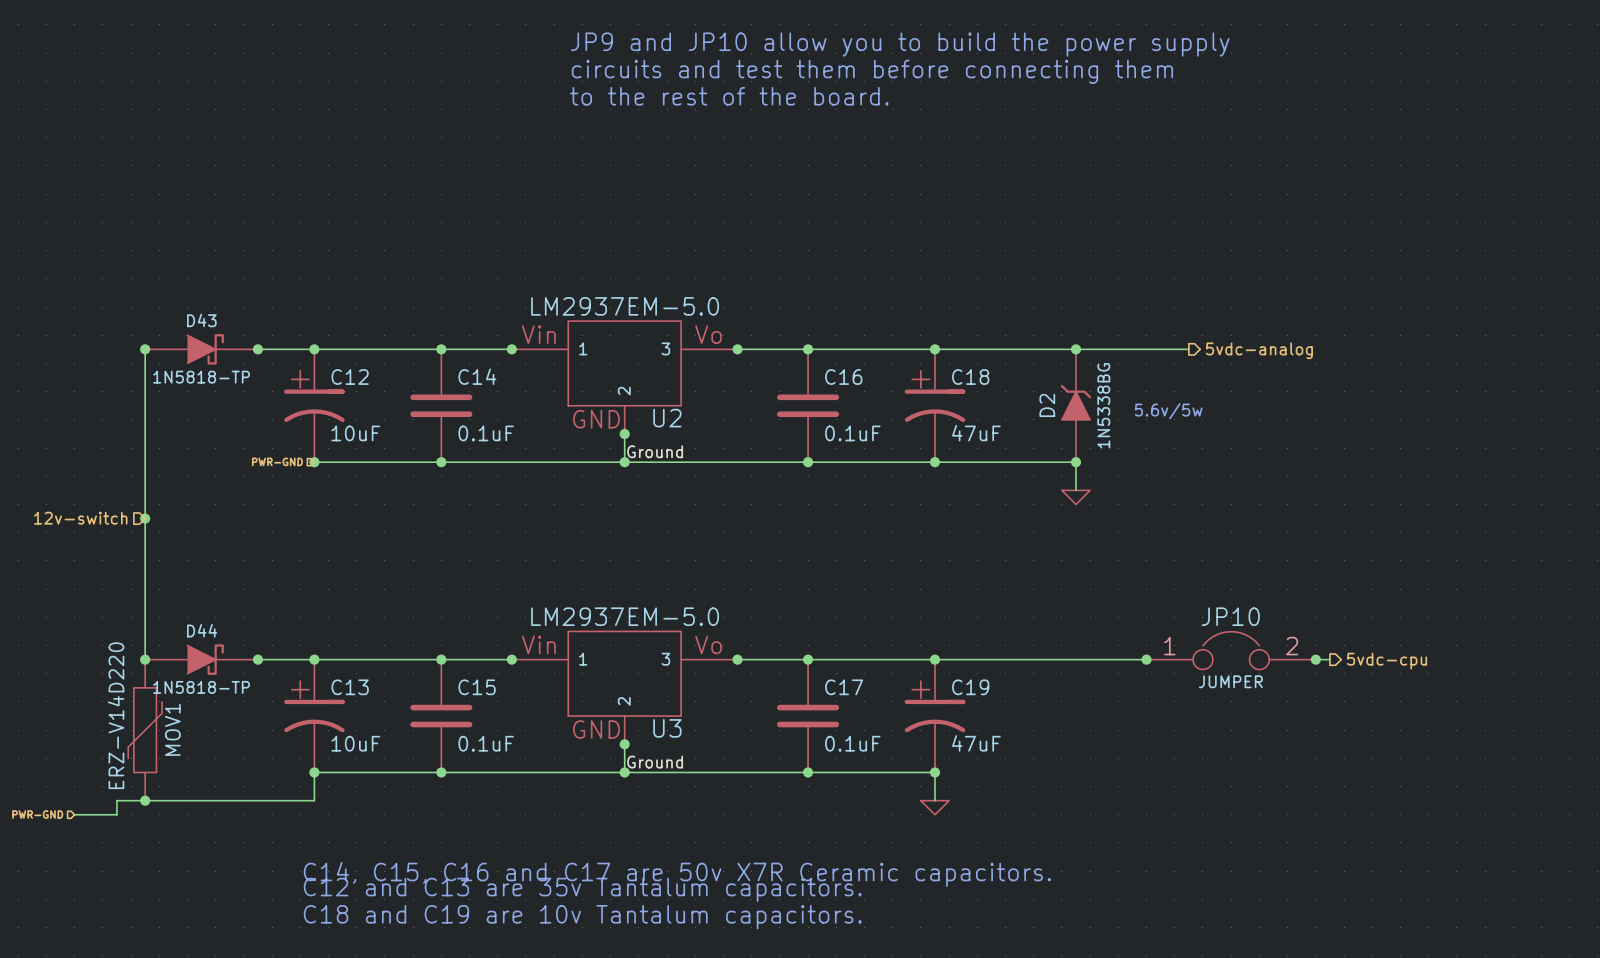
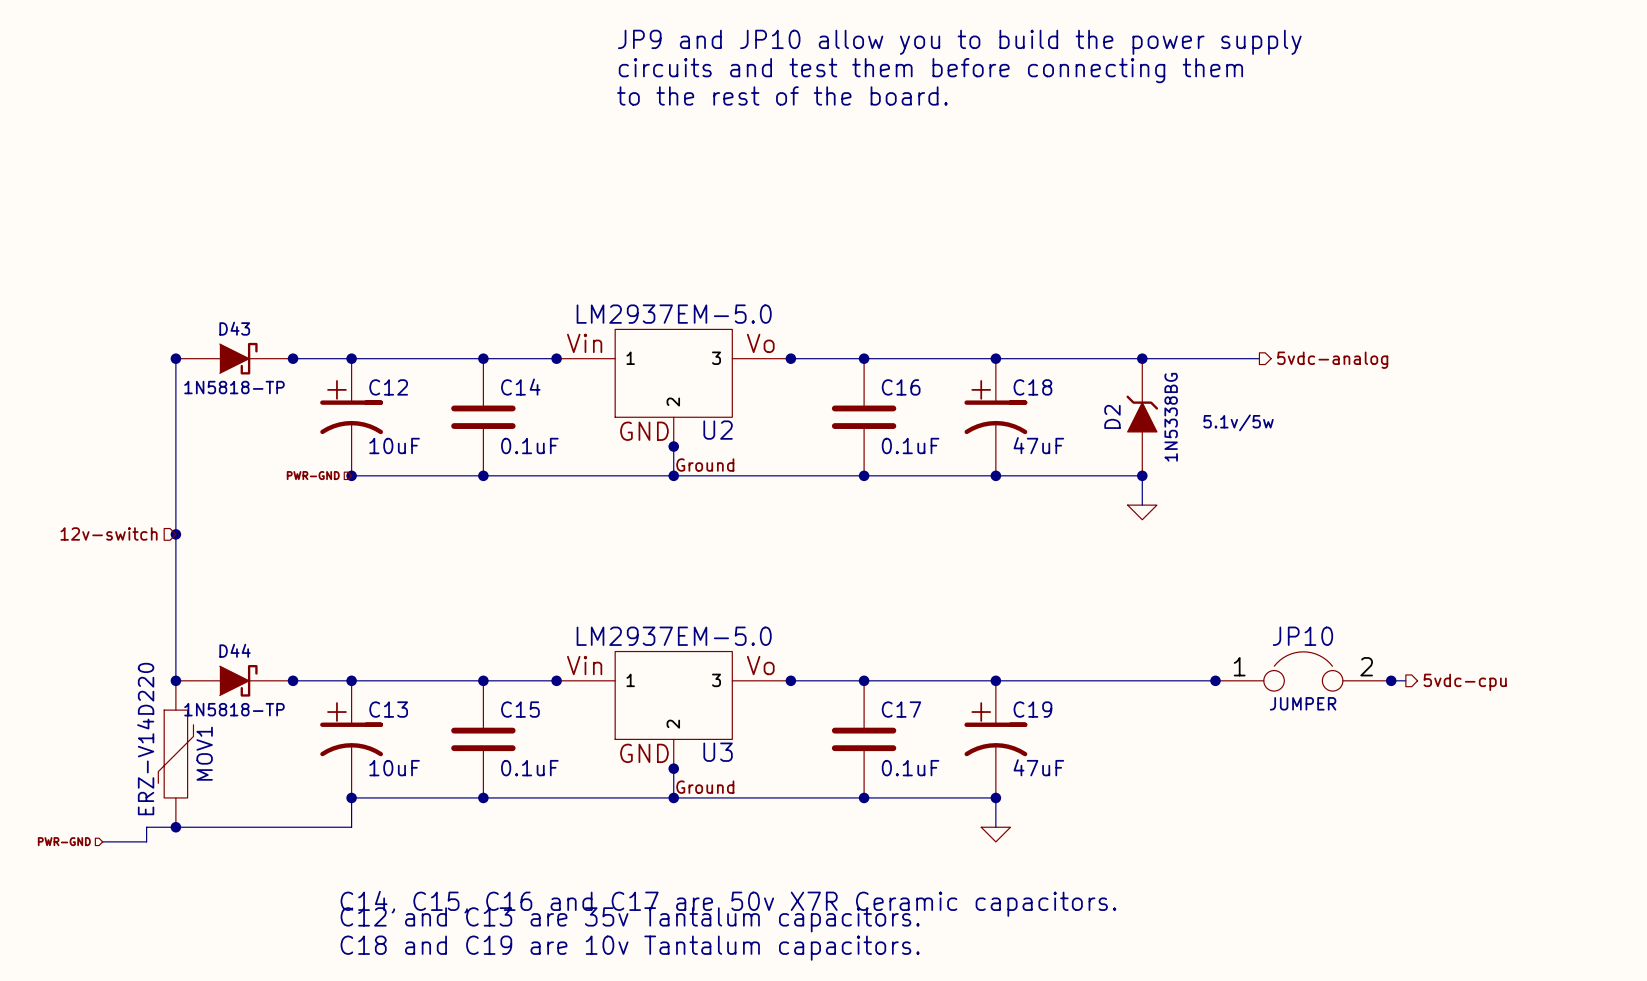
text: 5.6v/5w (1168, 411) -> 5.1v/5w (1238, 422)

